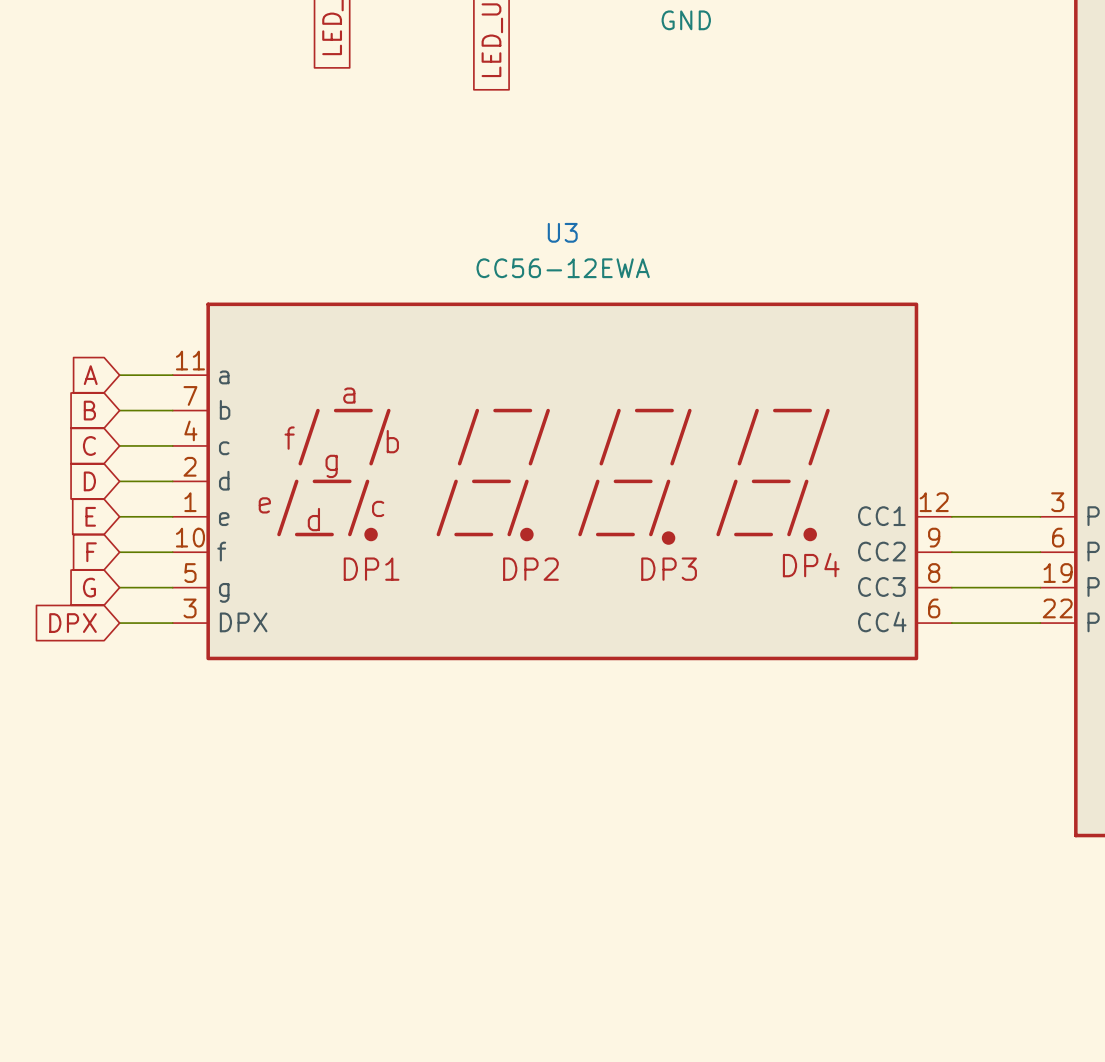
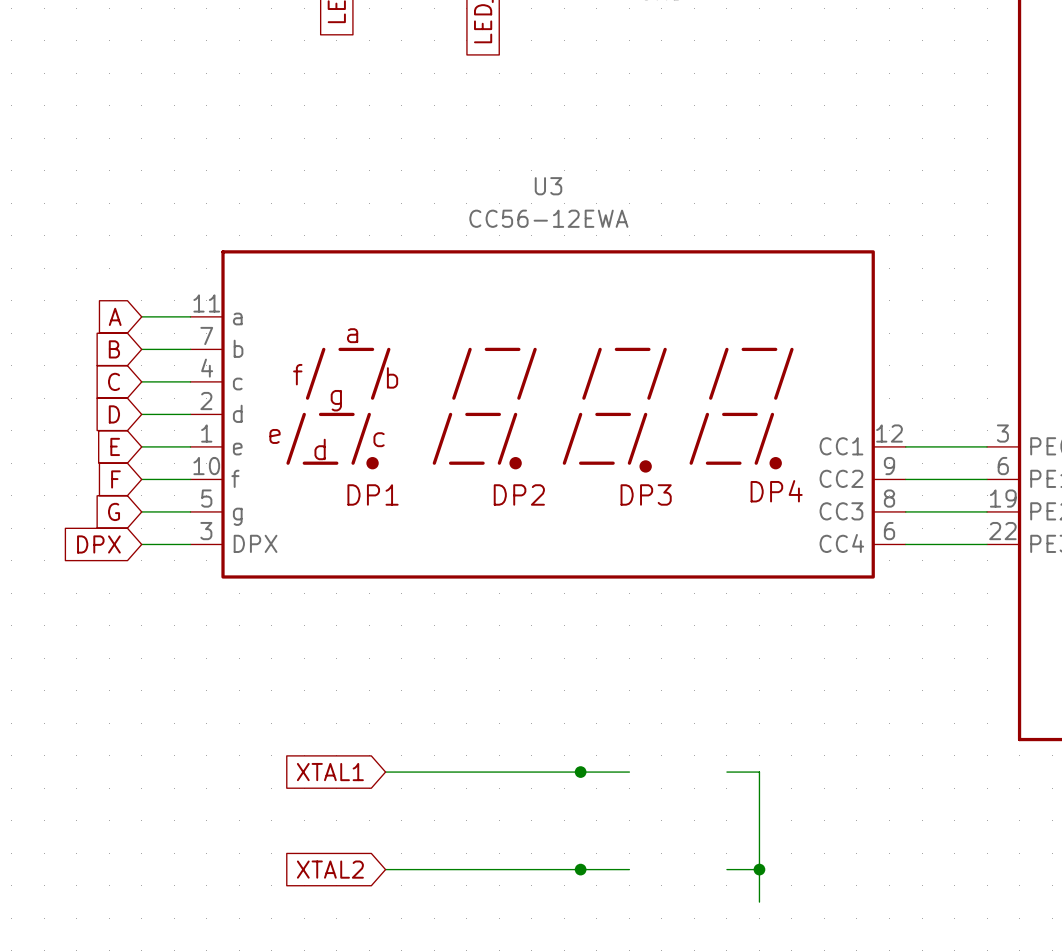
global label: none -> XTAL1 (330, 772)
wire: none -> (385, 772) (629, 772)
junction: none -> (580, 772)
wire: none -> (726, 772) (759, 772) (759, 902)
global label: none -> XTAL2 (330, 869)
wire: none -> (385, 869) (629, 869)
junction: none -> (580, 869)
wire: none -> (726, 869) (759, 869)
junction: none -> (759, 869)

